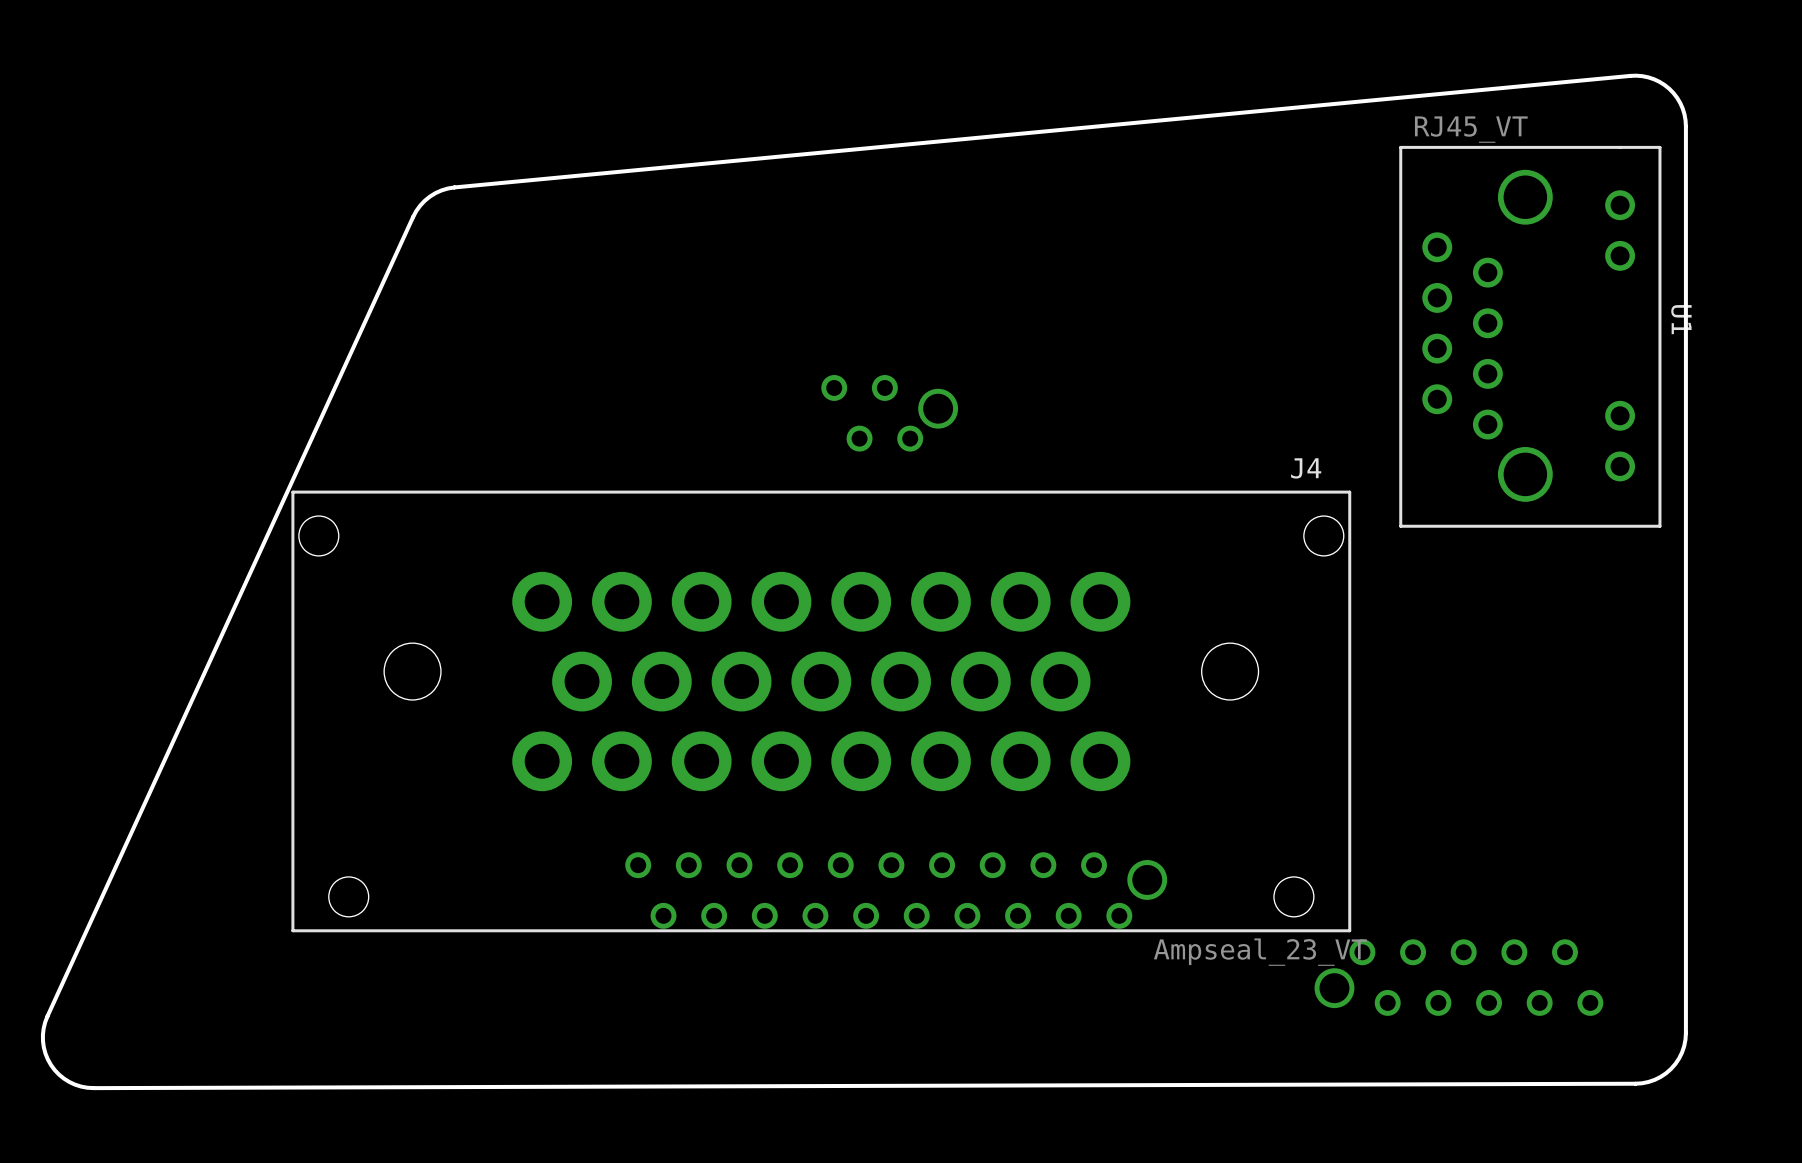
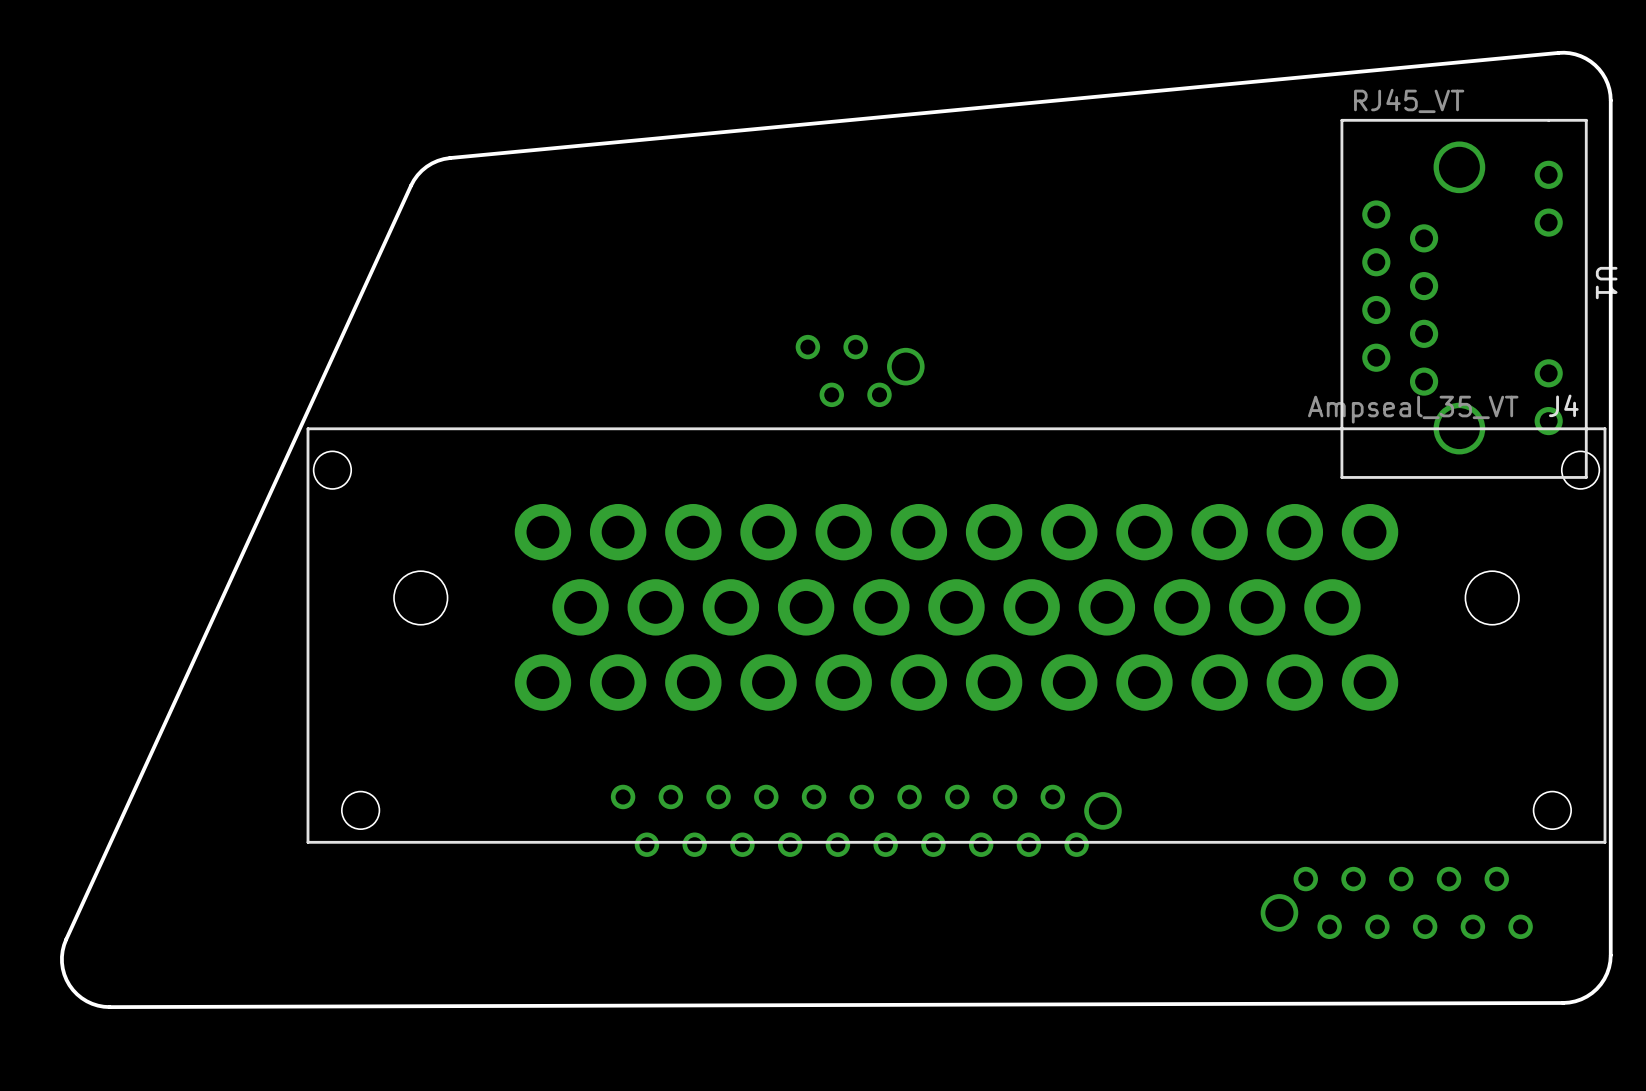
J4 name position: J4 (1306, 468) -> J4 (1563, 405)
J4 footprint: [291, 490, 1352, 933] -> [306, 427, 1607, 844]
J4 value: Ampseal_23_VT (1260, 952) -> Ampseal_35_VT (1413, 409)

